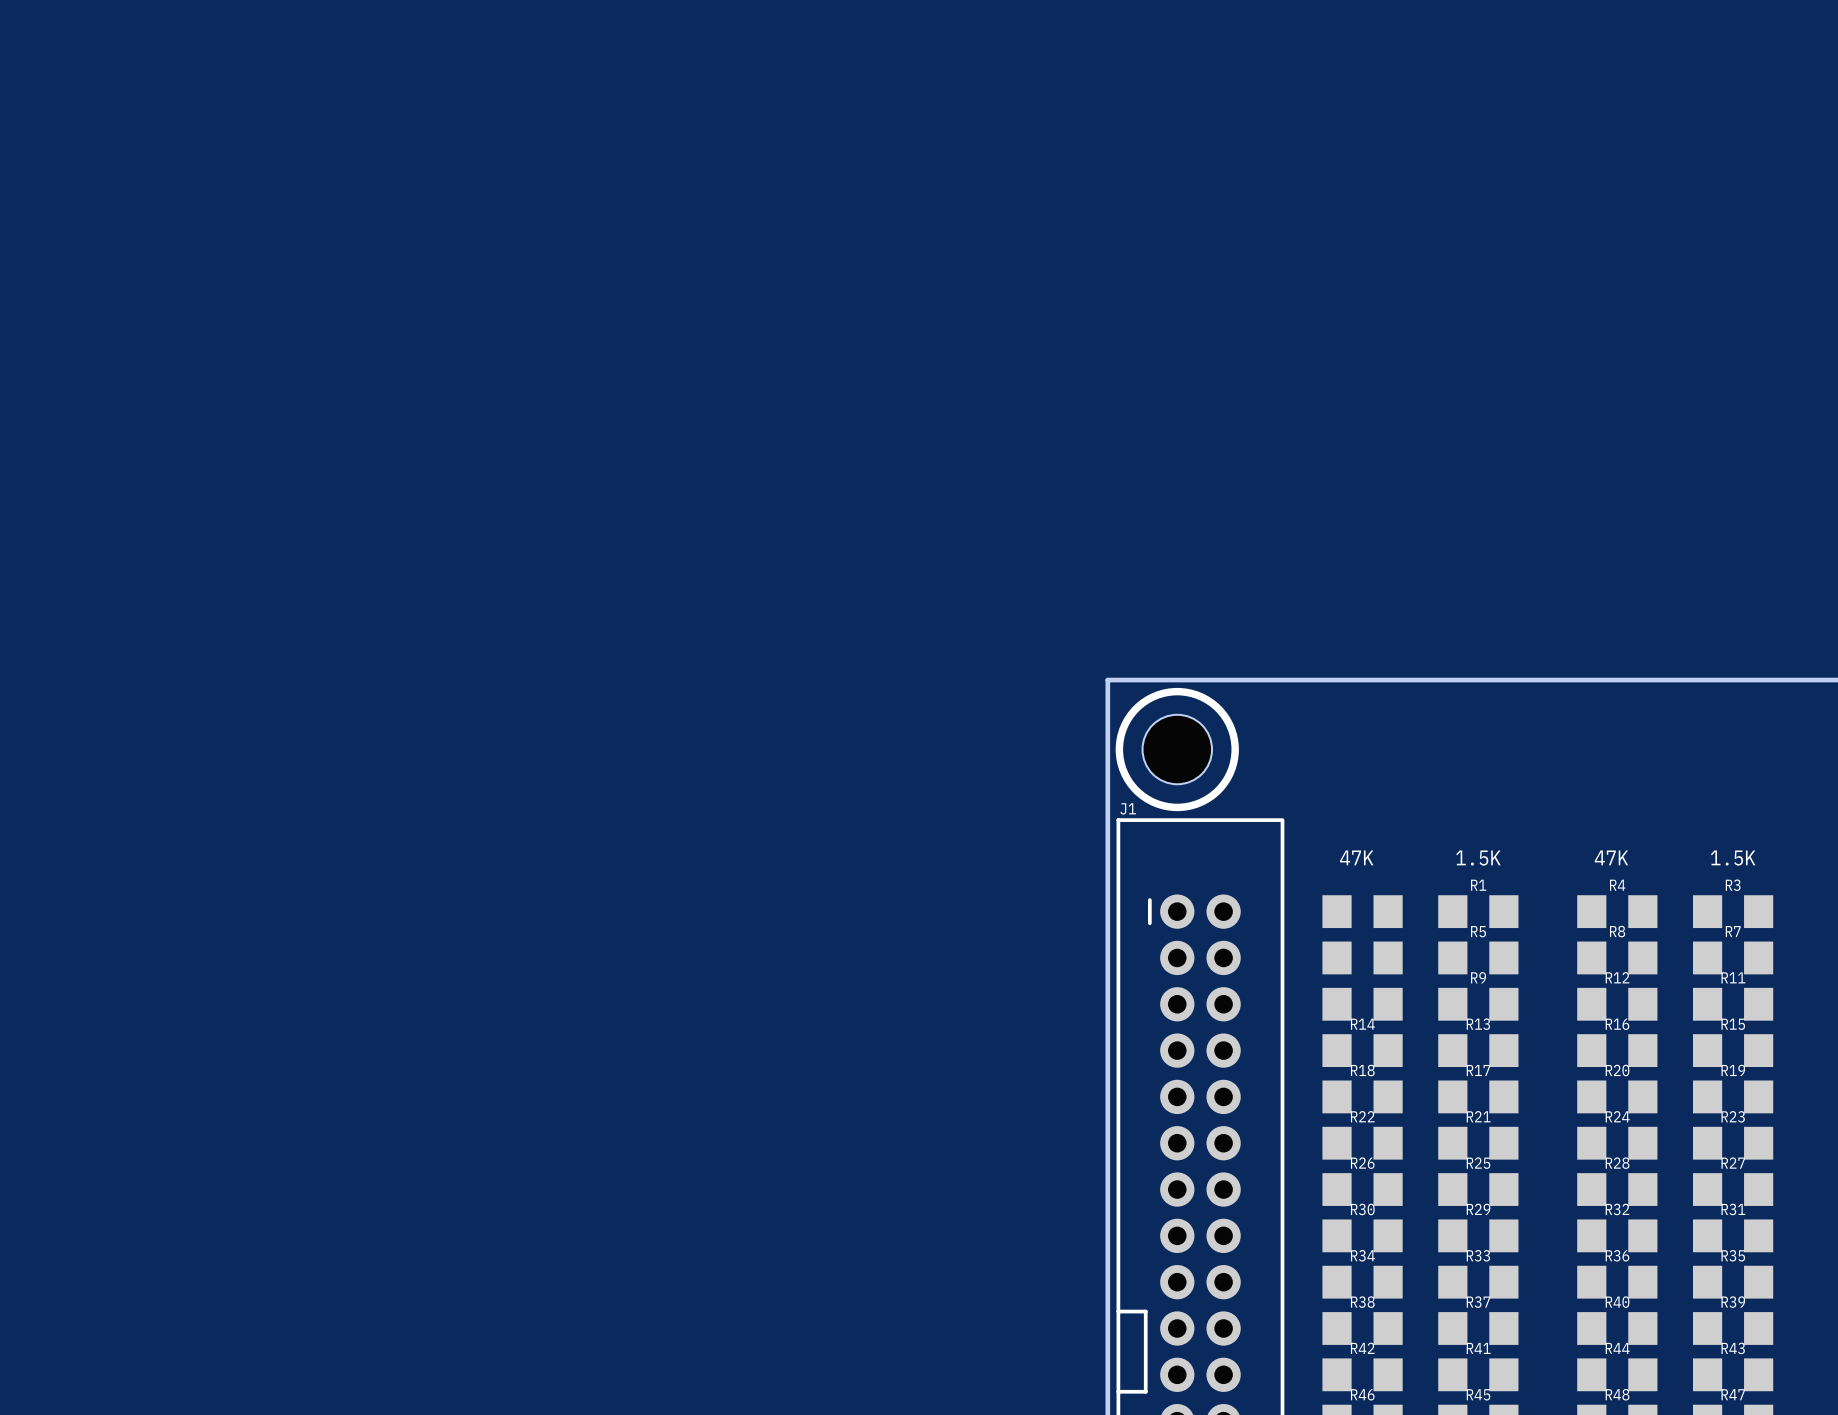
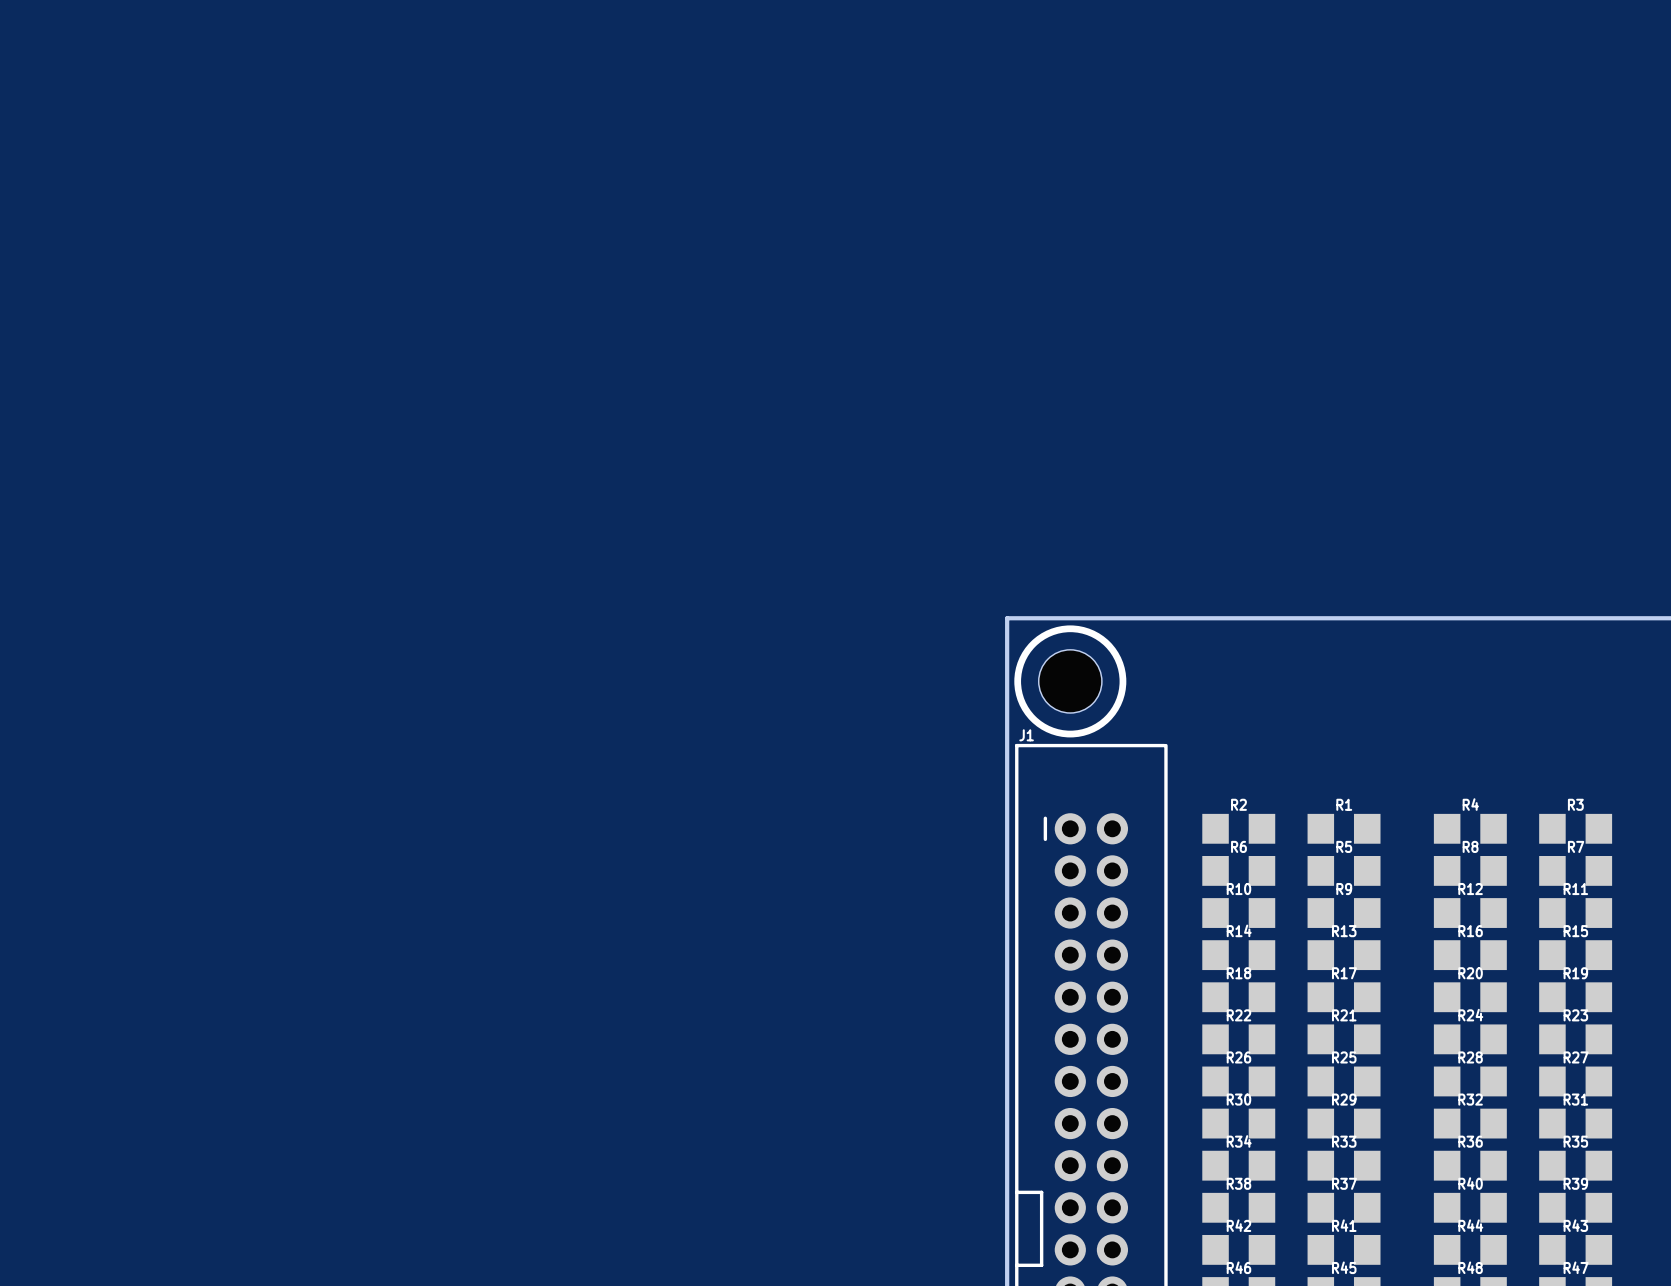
text: 47K (1356, 857) -> none
text: 47K (1611, 857) -> none
text: 1.5K (1478, 858) -> none
text: 1.5K (1733, 858) -> none
R2 name: none -> R2 (1238, 804)
R6 name: none -> R6 (1238, 846)
R10 name: none -> R10 (1238, 889)

